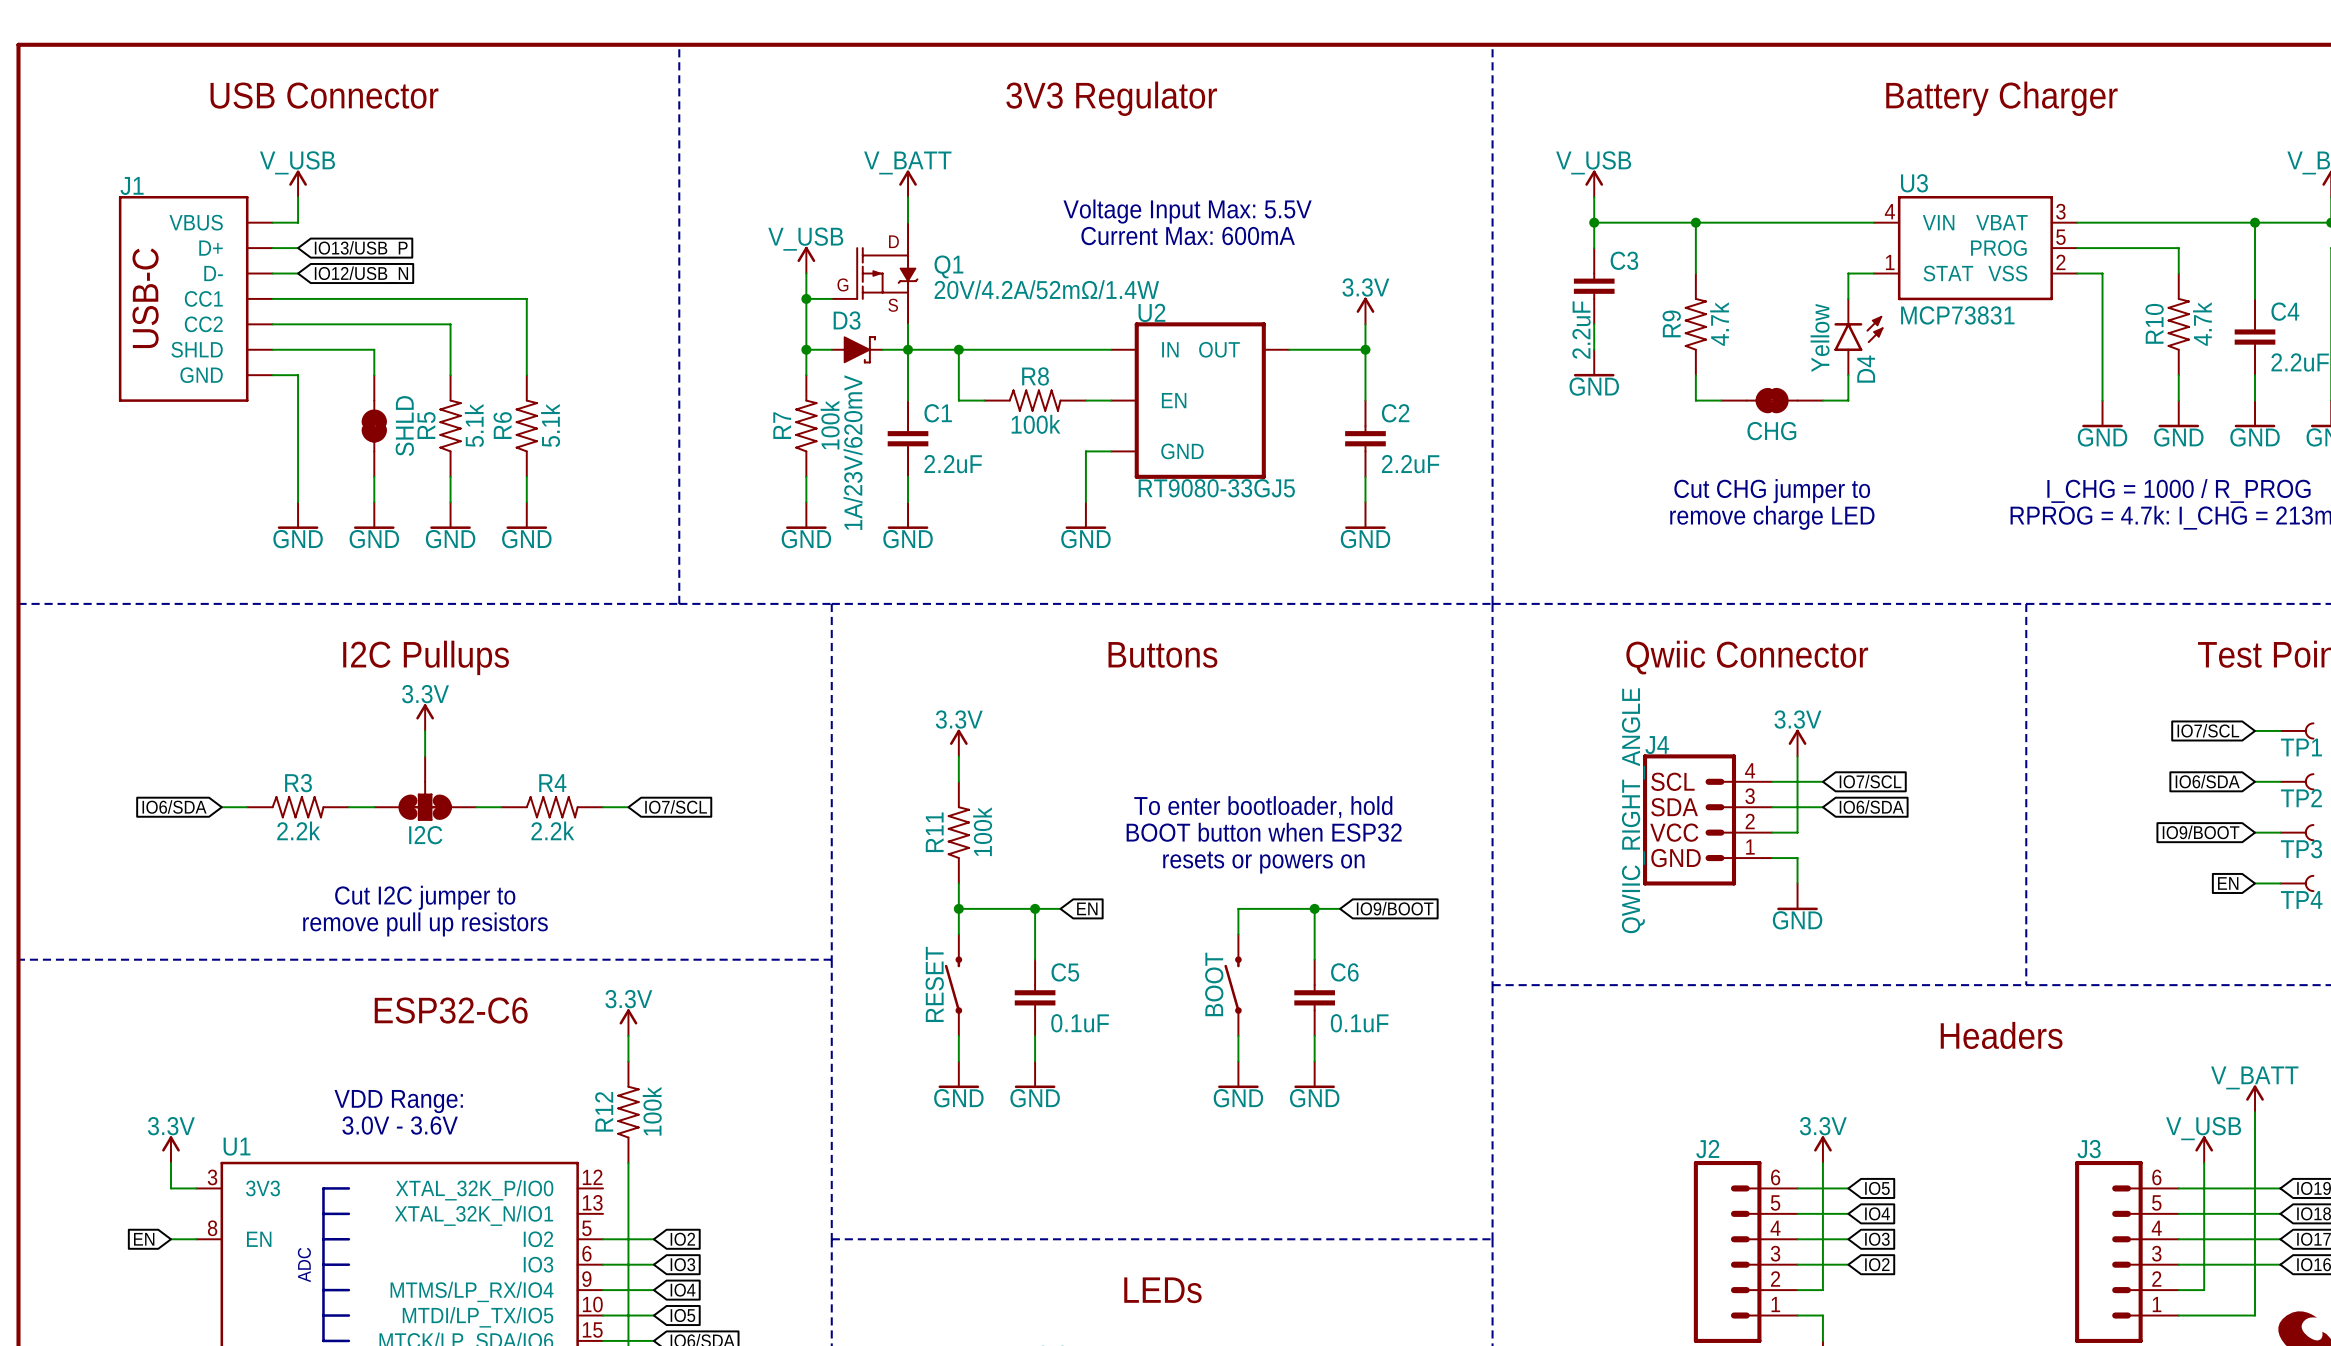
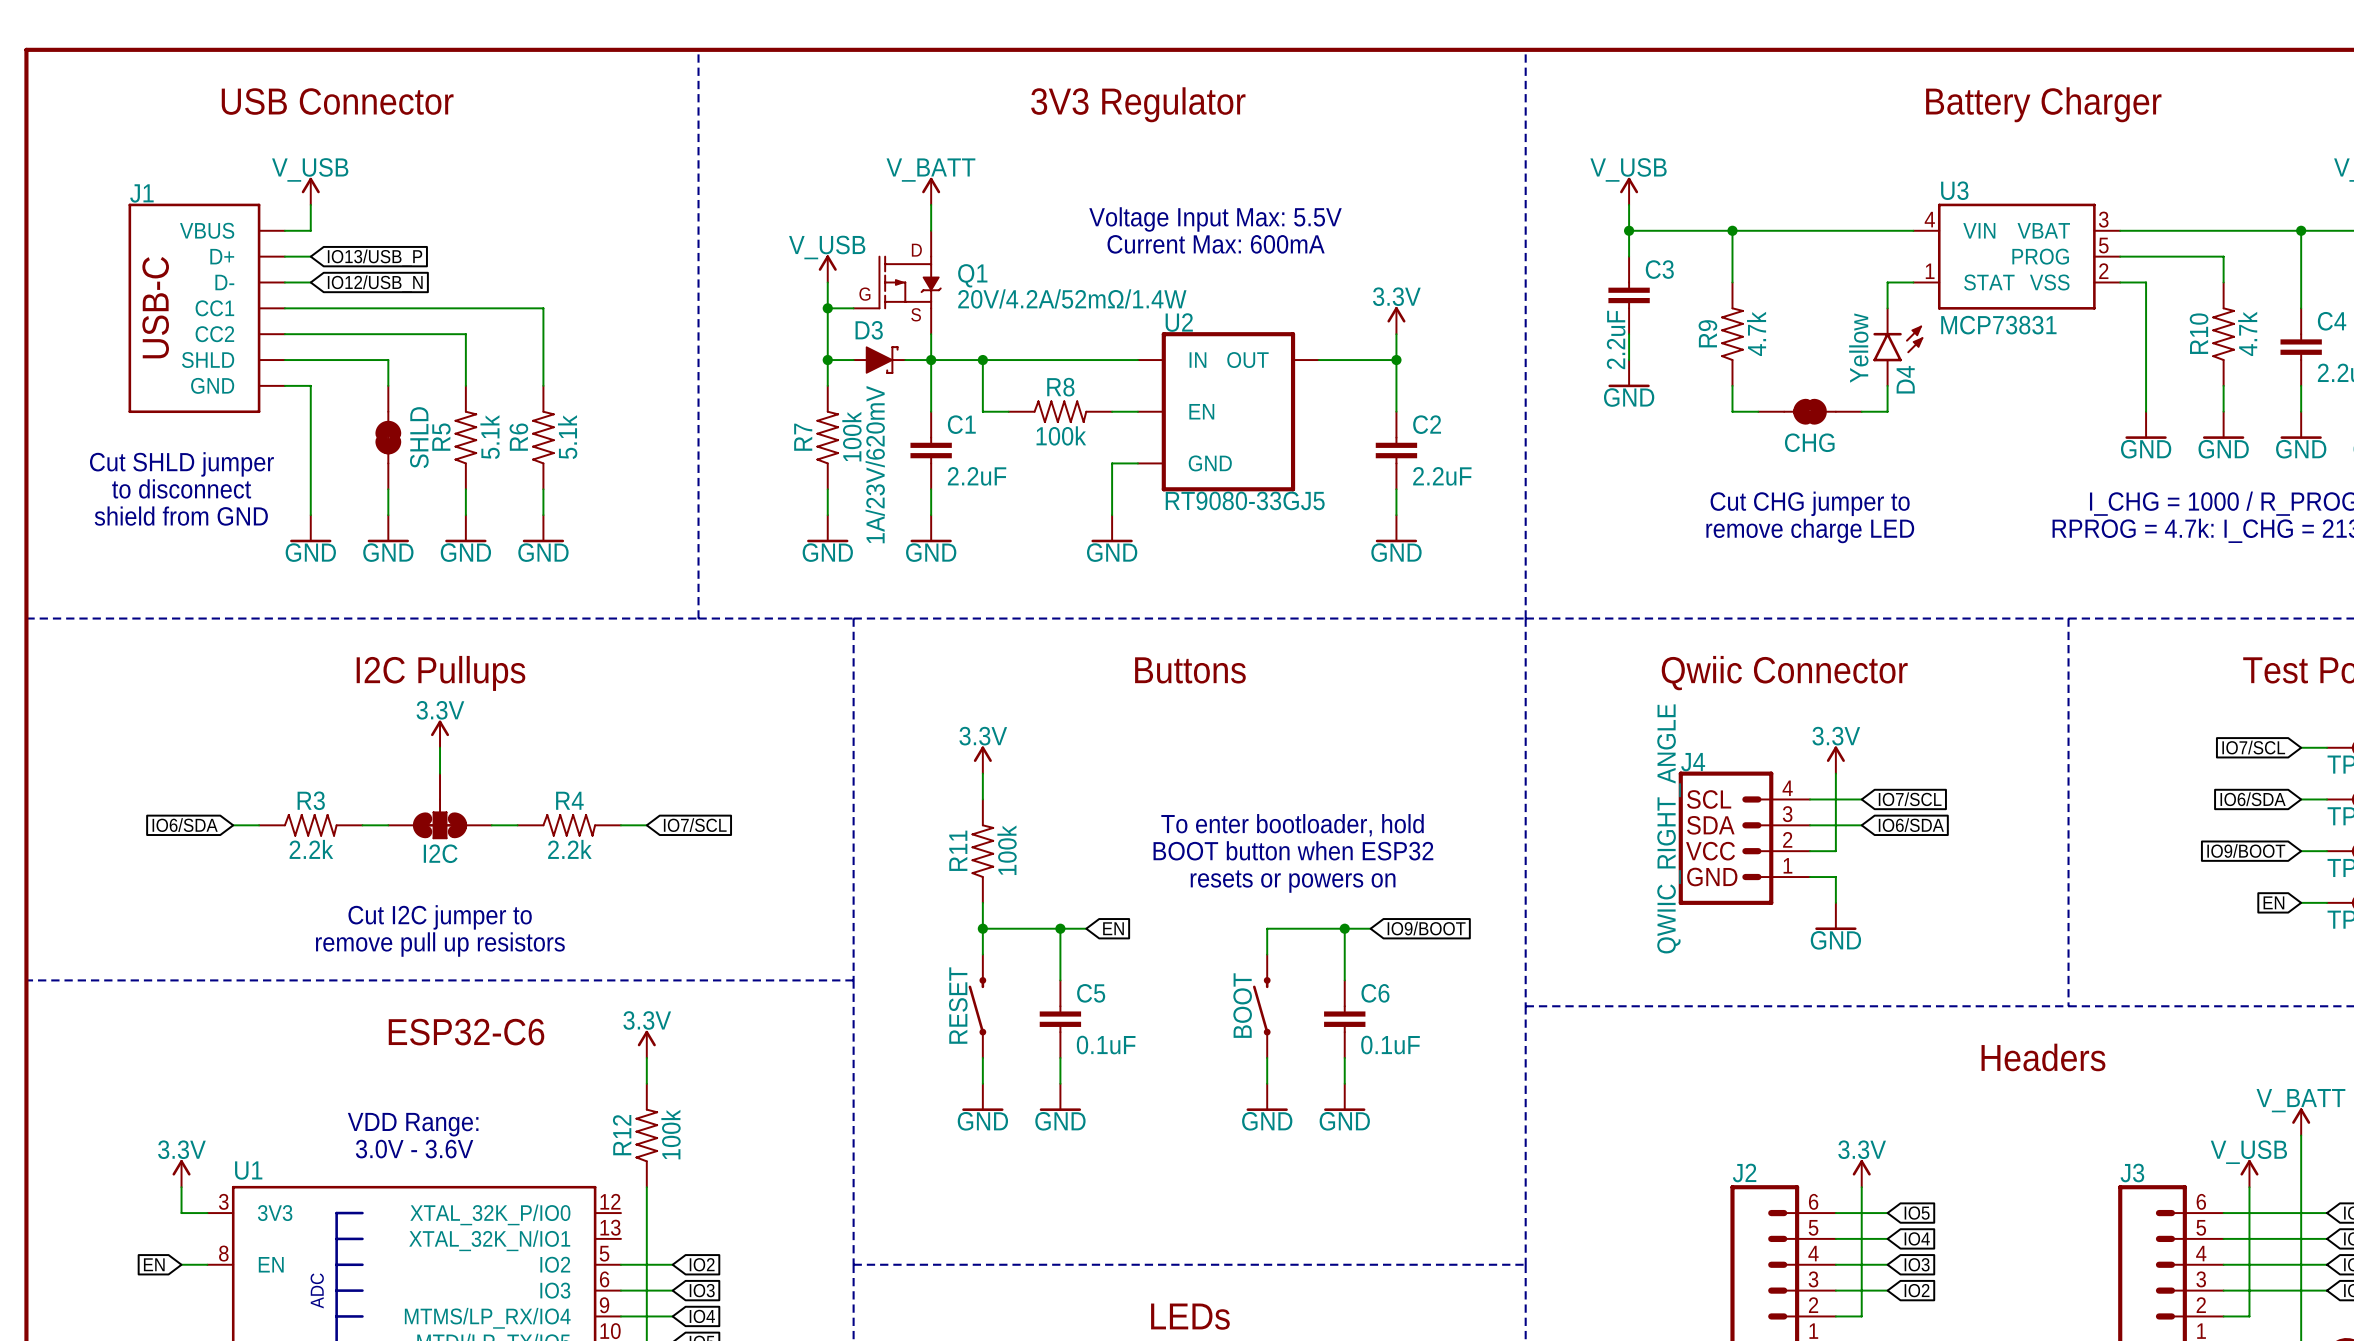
text: none -> Cut SHLD jumper (181, 464)
text: none -> to disconnect (181, 488)
text: none -> shield from GND (181, 516)

